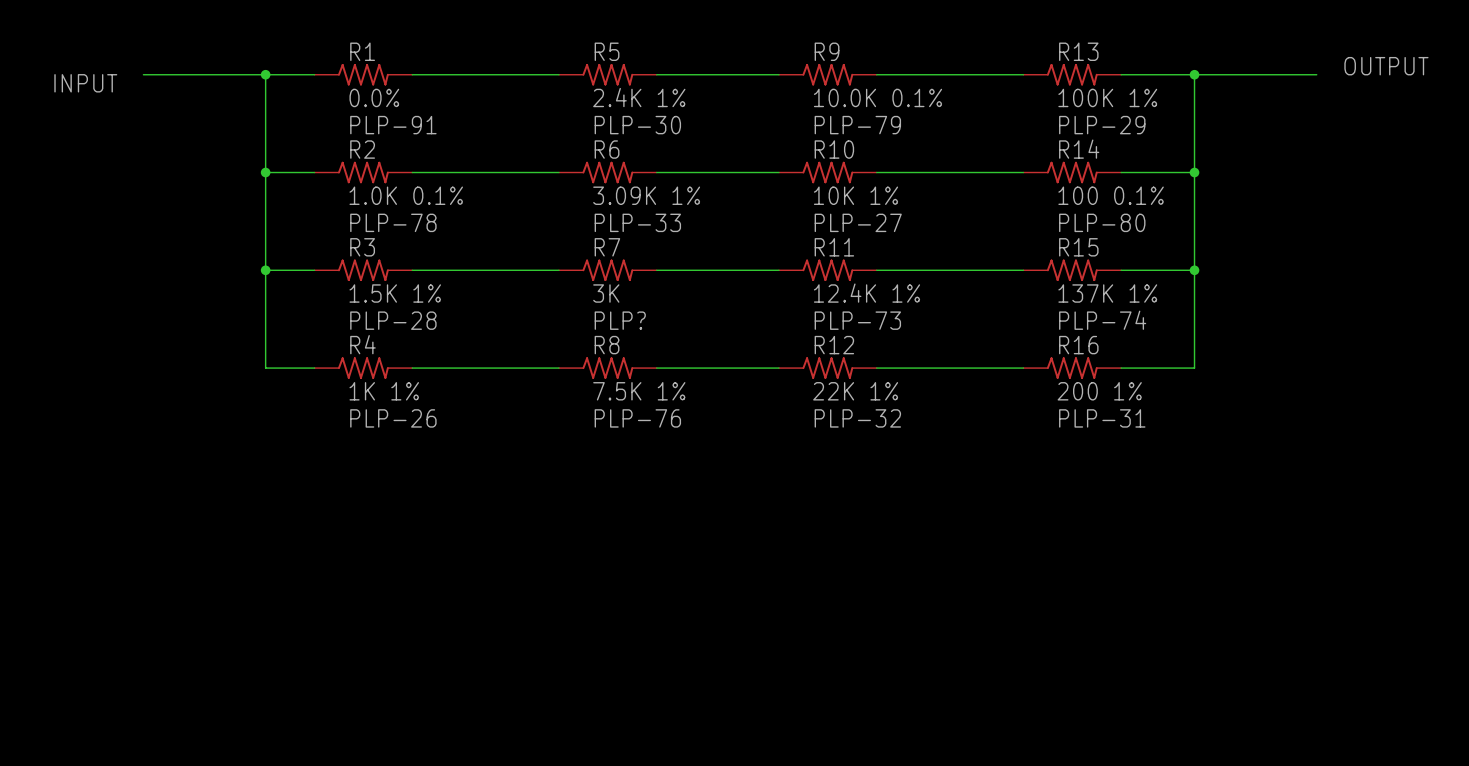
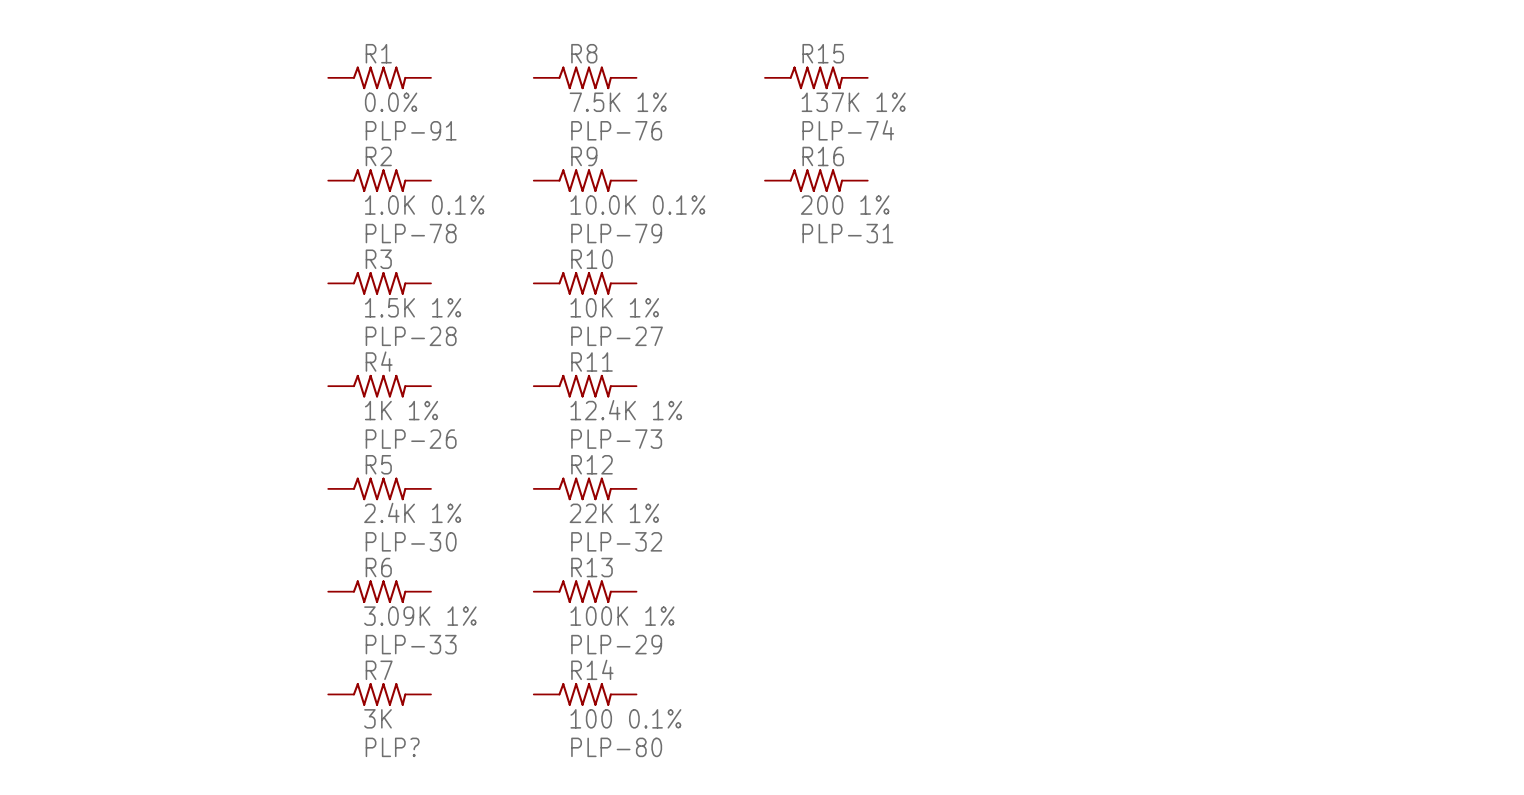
label: OUTPUT (1386, 66) -> none
wire: (143, 74) (314, 74) -> none
wire: (265, 74) (265, 368) (314, 368) -> none
junction: (265, 74) -> none
wire: (412, 74) (558, 74) -> none
R5 position: (607, 74) -> (379, 488)
wire: (656, 74) (778, 74) -> none
R9 position: (827, 74) -> (585, 180)
wire: (876, 74) (1023, 74) -> none
R13 position: (1072, 74) -> (585, 591)
wire: (1121, 74) (1316, 74) -> none
wire: (1194, 74) (1194, 368) (1121, 368) -> none
junction: (1194, 74) -> none
label: INPUT (85, 83) -> none
wire: (265, 172) (314, 172) -> none
junction: (265, 172) -> none
wire: (412, 172) (558, 172) -> none
R6 position: (607, 172) -> (379, 591)
wire: (656, 172) (778, 172) -> none
R10 position: (827, 172) -> (585, 283)
wire: (876, 172) (1023, 172) -> none
R14 position: (1072, 172) -> (585, 694)
wire: (1121, 172) (1194, 172) -> none
junction: (1194, 172) -> none
wire: (265, 270) (314, 270) -> none
junction: (265, 270) -> none
wire: (412, 270) (558, 270) -> none
R7 position: (607, 270) -> (379, 694)
wire: (656, 270) (778, 270) -> none
R11 position: (827, 270) -> (585, 386)
wire: (876, 270) (1023, 270) -> none
R15 position: (1072, 270) -> (816, 77)
wire: (1121, 270) (1194, 270) -> none
junction: (1194, 270) -> none
wire: (412, 368) (558, 368) -> none
R8 position: (607, 368) -> (585, 77)
wire: (656, 368) (778, 368) -> none
R12 position: (827, 368) -> (585, 488)
wire: (876, 368) (1023, 368) -> none
R16 position: (1072, 368) -> (816, 180)

